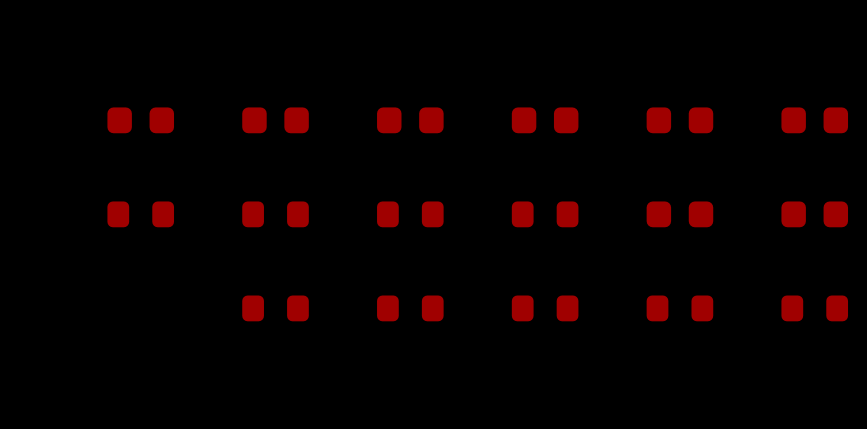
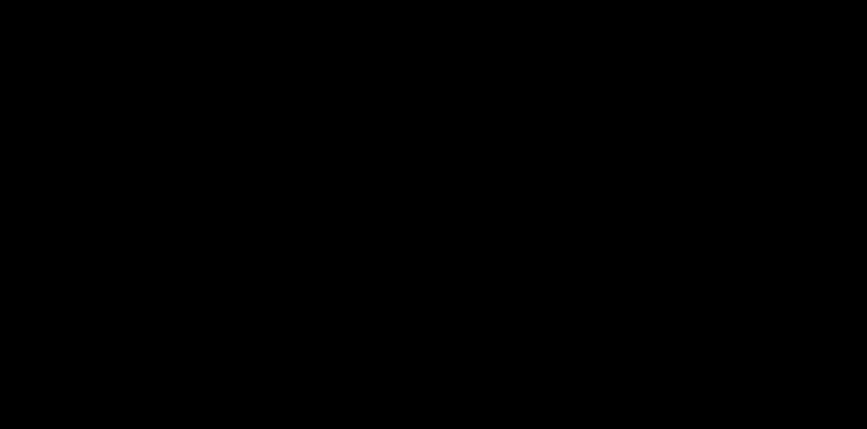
part: (140, 120) -> none
part: (275, 120) -> none
part: (410, 120) -> none
part: (545, 120) -> none
part: (679, 120) -> none
part: (814, 120) -> none
part: (140, 214) -> none
part: (275, 214) -> none
part: (410, 214) -> none
part: (545, 214) -> none
part: (679, 214) -> none
part: (814, 214) -> none
part: (275, 308) -> none
part: (410, 308) -> none
part: (545, 308) -> none
part: (679, 308) -> none
part: (814, 308) -> none

